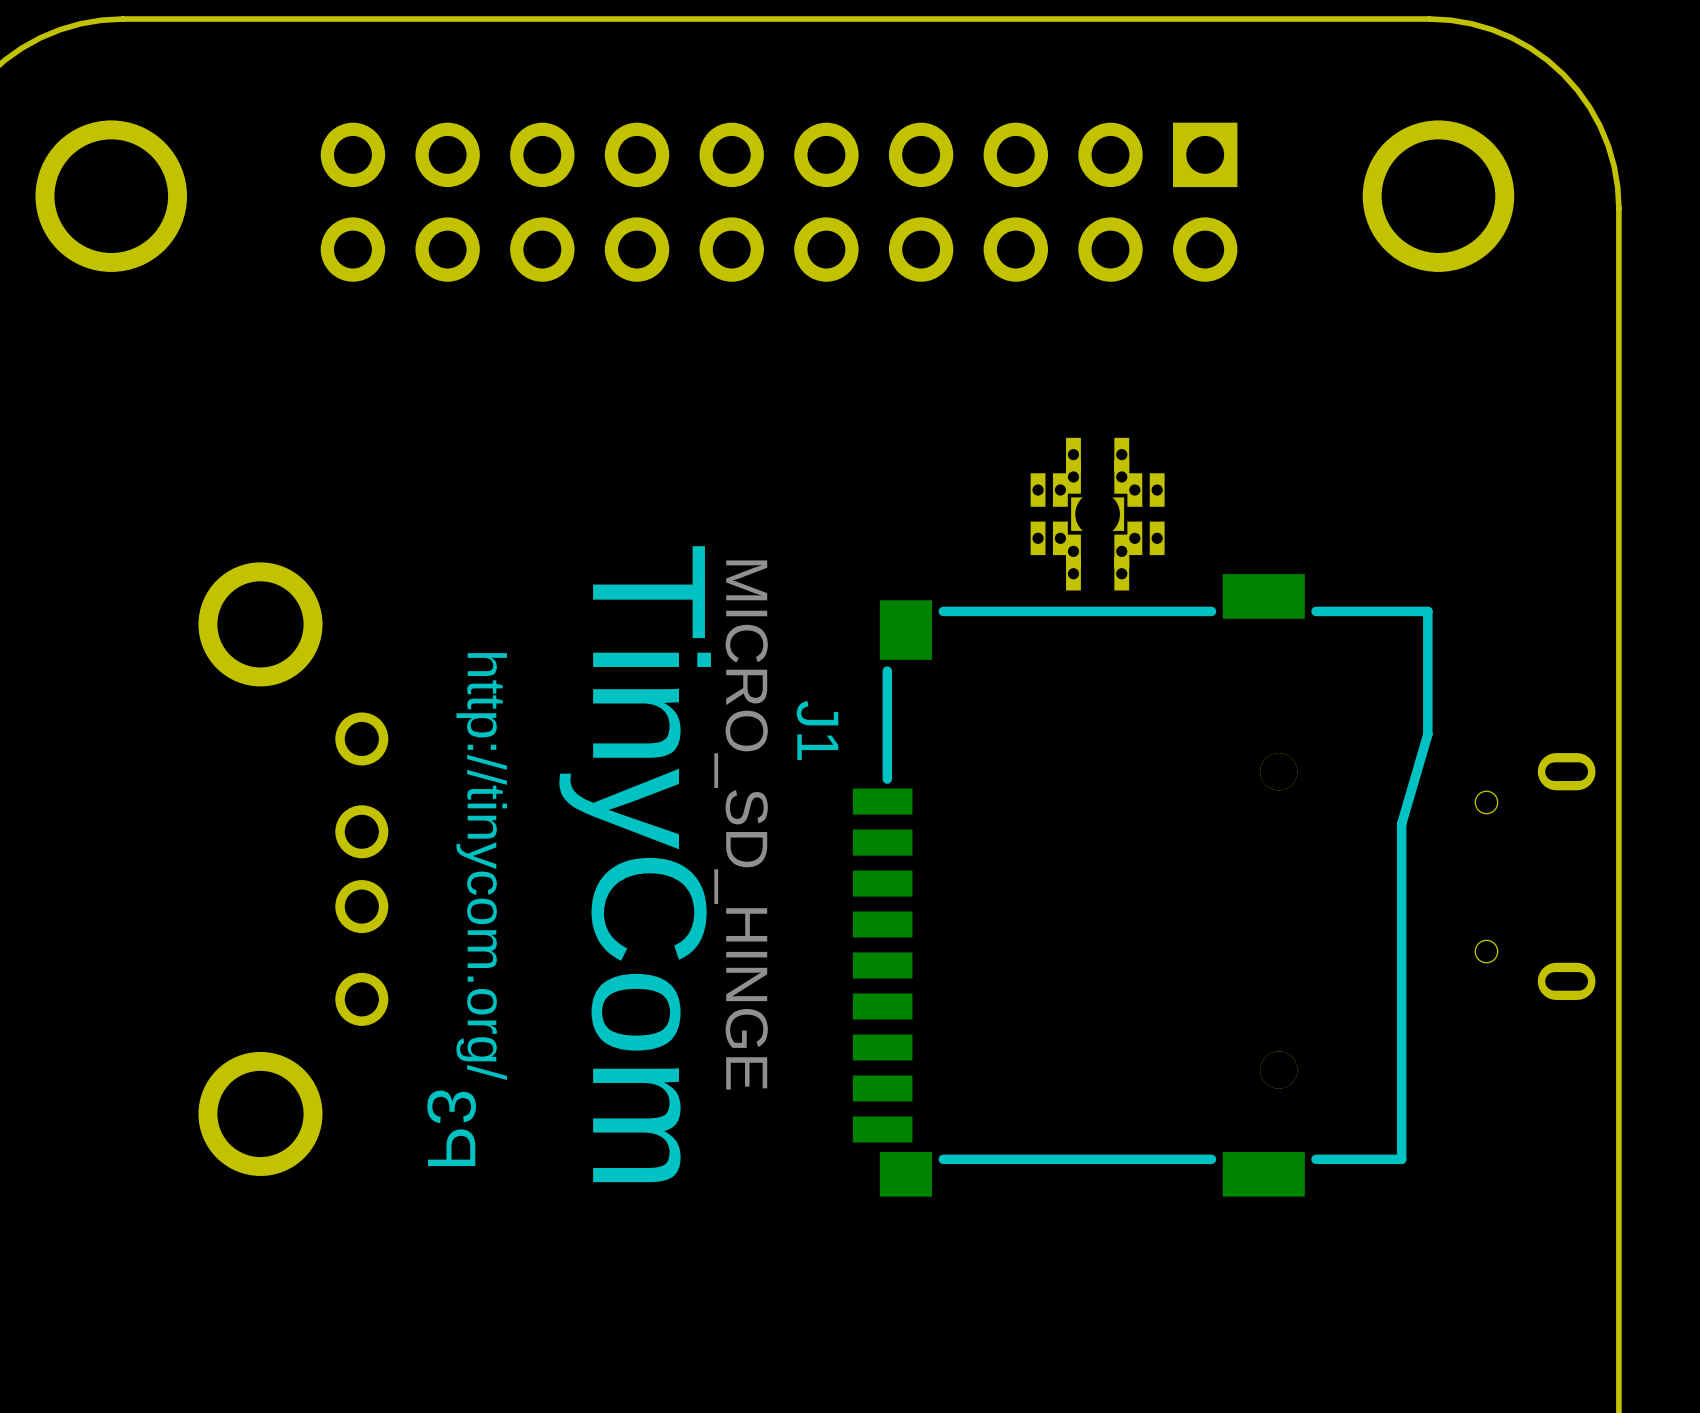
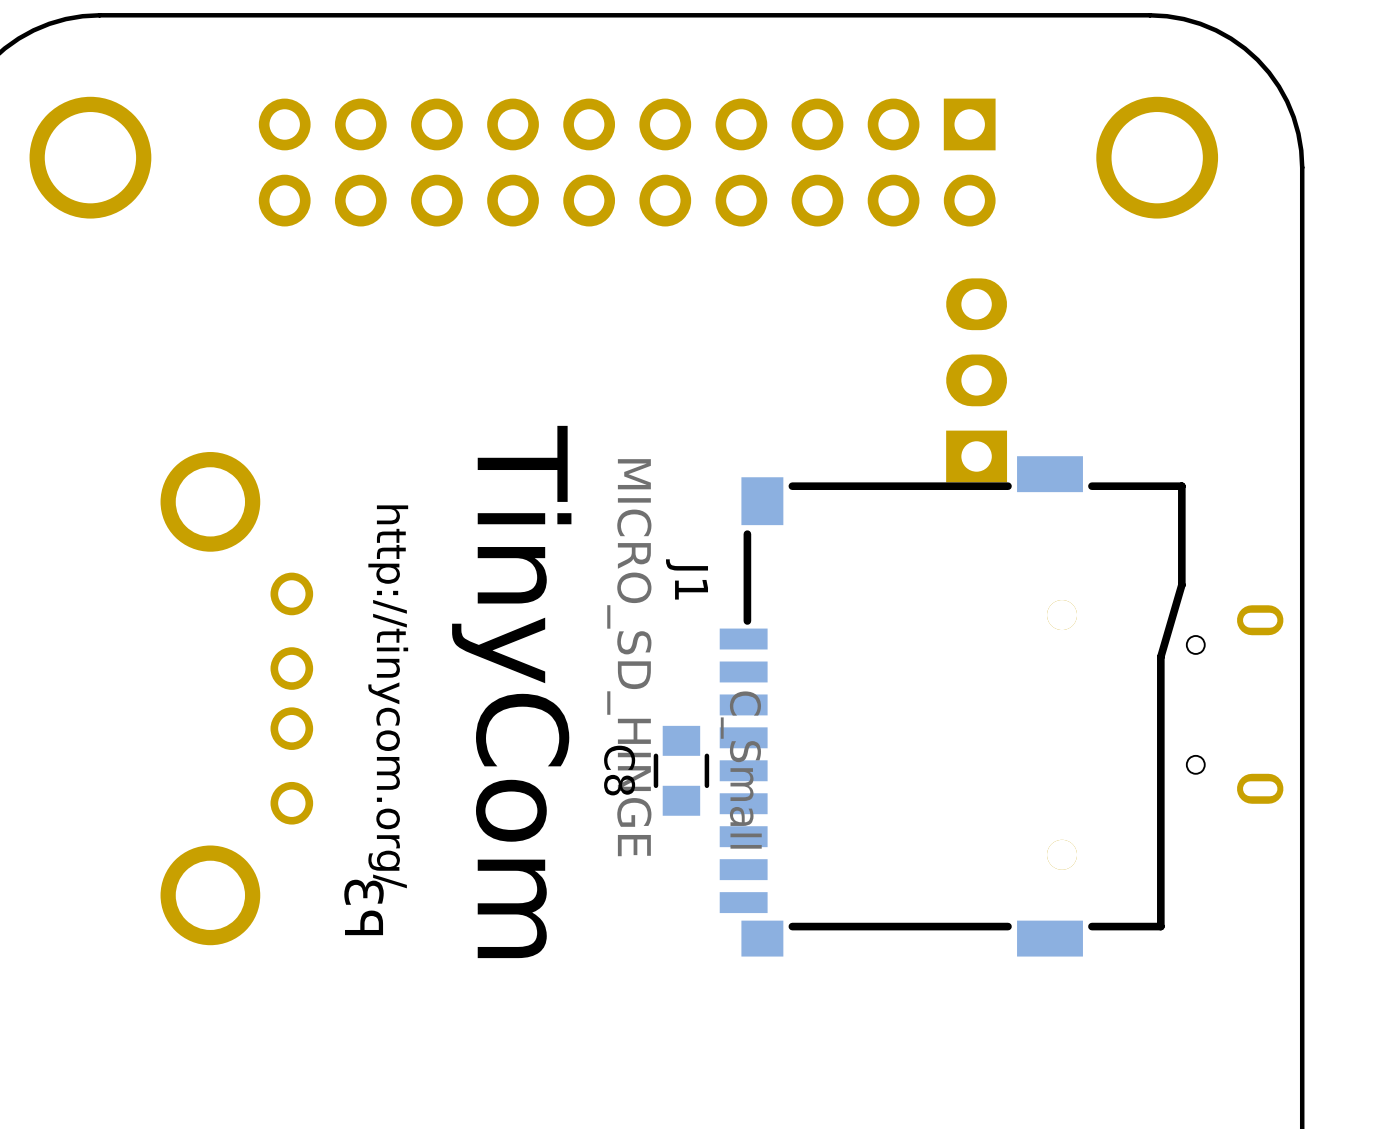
part: none -> (976, 380)
part: (1097, 514) -> none
J1 position: (1142, 885) -> (952, 706)
C8: none -> C_Small (681, 770)

